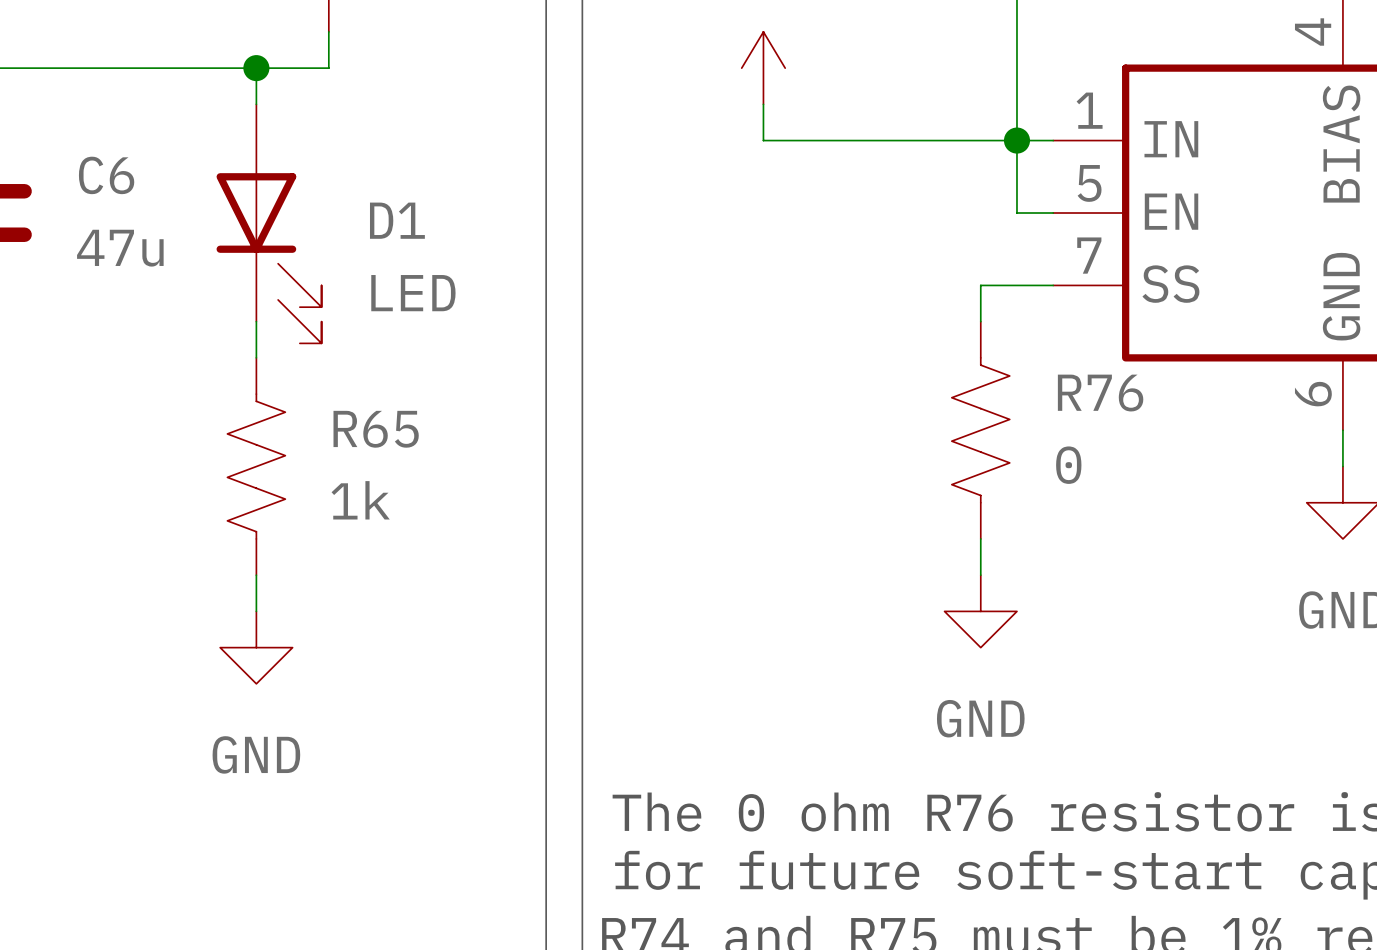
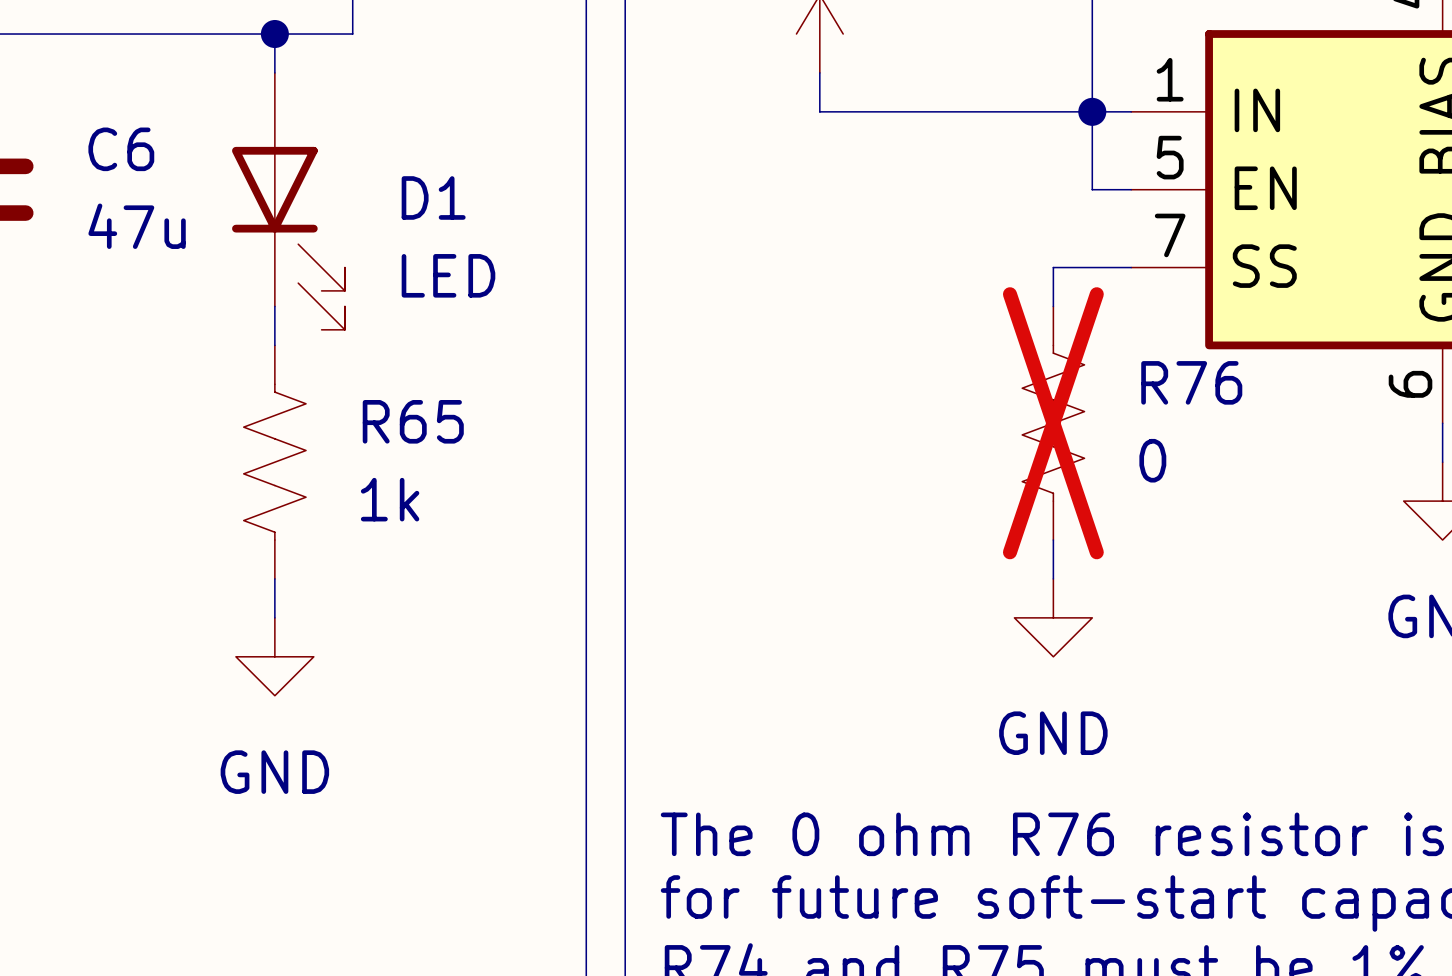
R76 do-not-place cross: none -> (1053, 423)

